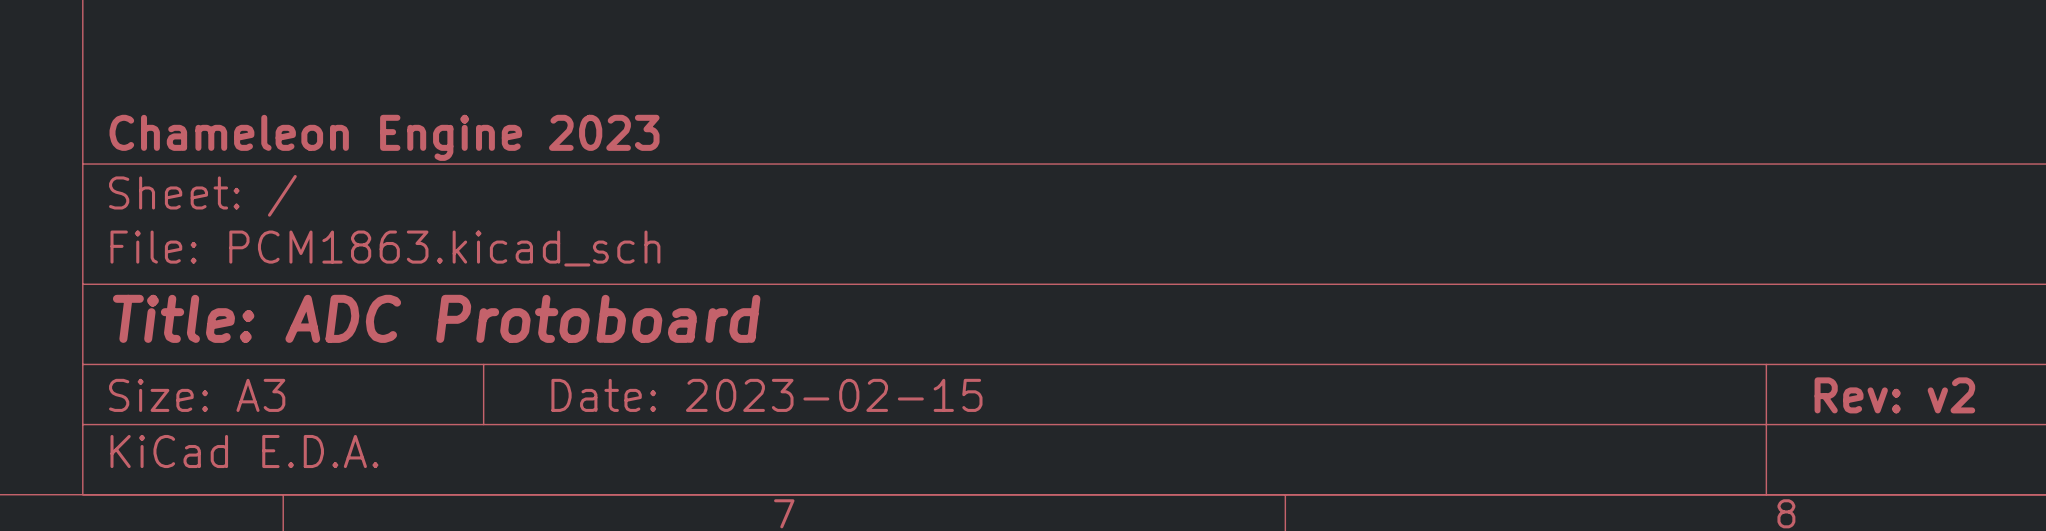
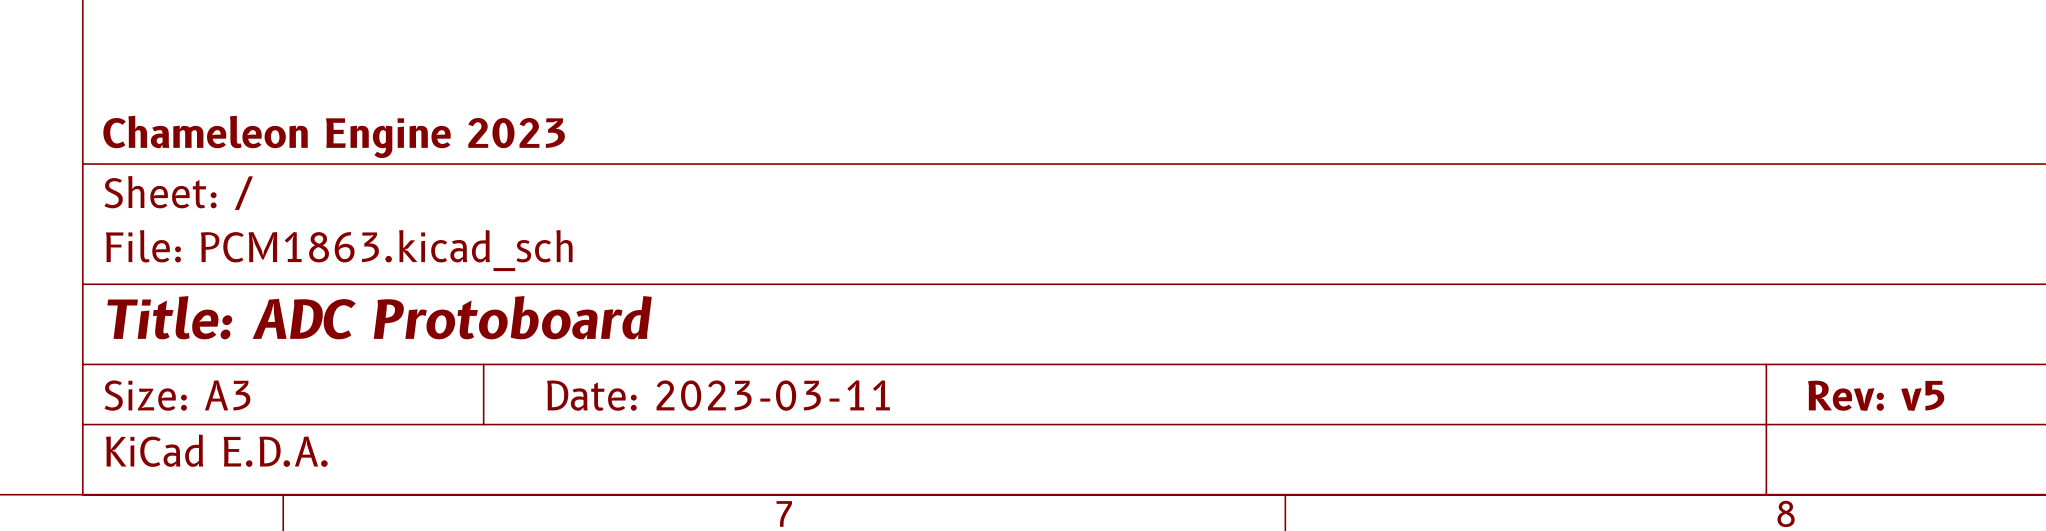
title block: Date: 2023-02-15 (766, 395) -> Date: 2023-03-11 (718, 395)
title block: Rev: v2 (1894, 395) -> Rev: v5 (1876, 395)

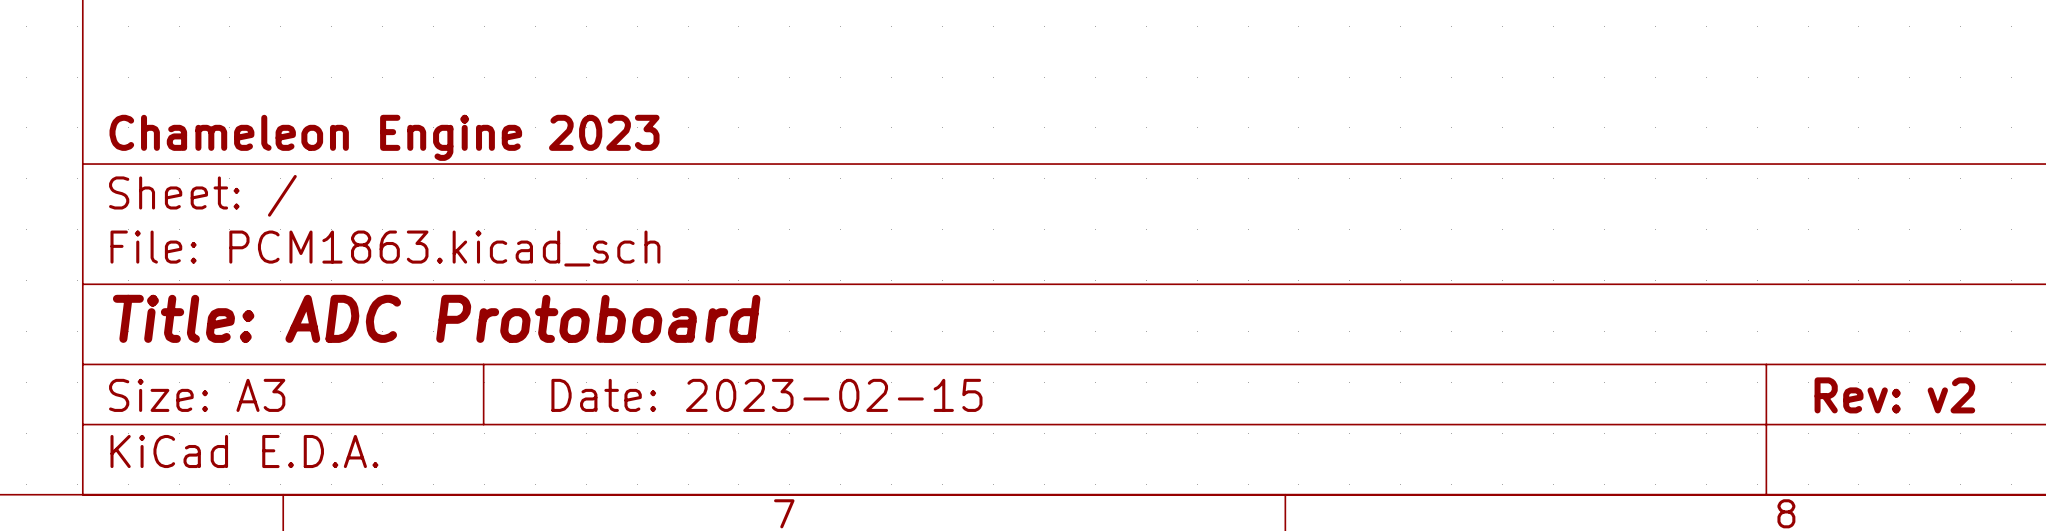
title block: Date: 2023-03-11 (718, 395) -> Date: 2023-02-15 (766, 395)
title block: Rev: v5 (1876, 395) -> Rev: v2 (1894, 395)

